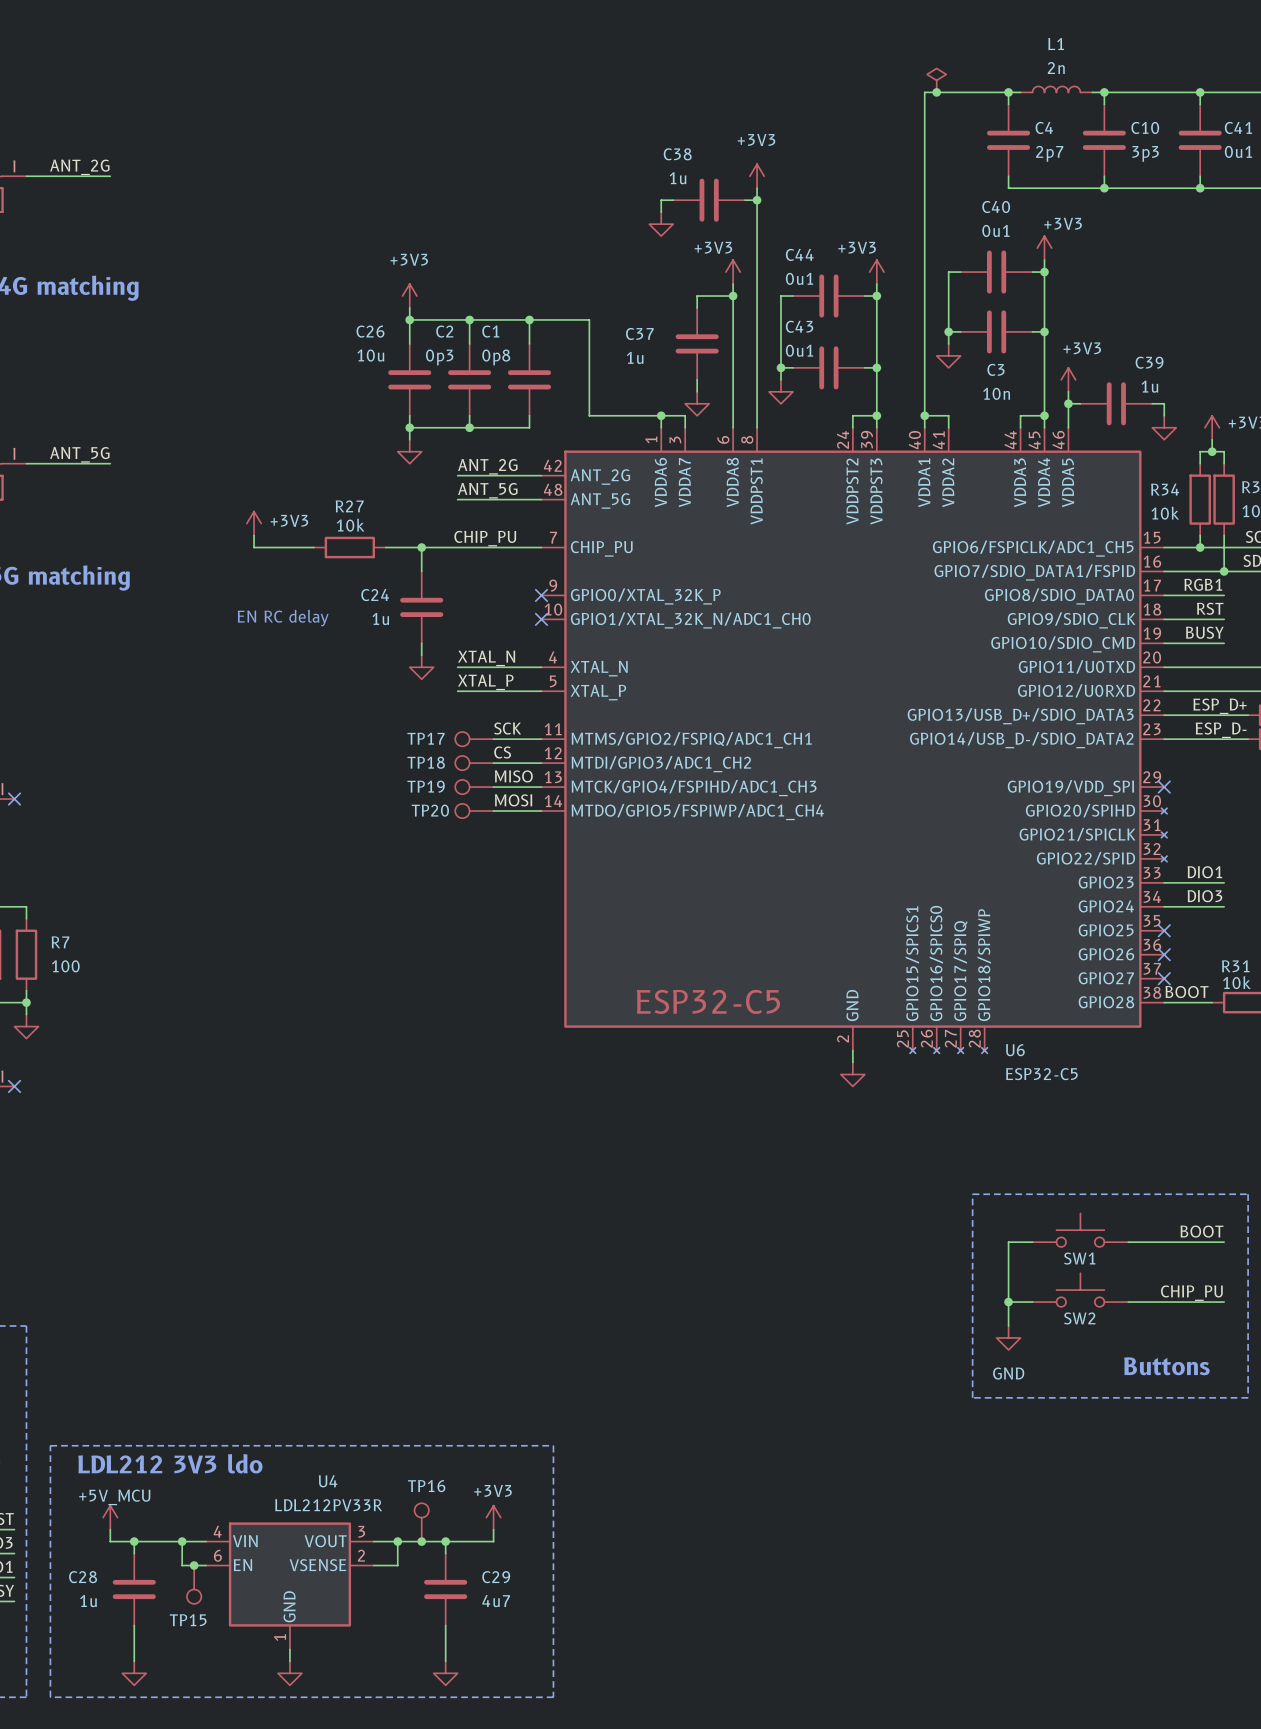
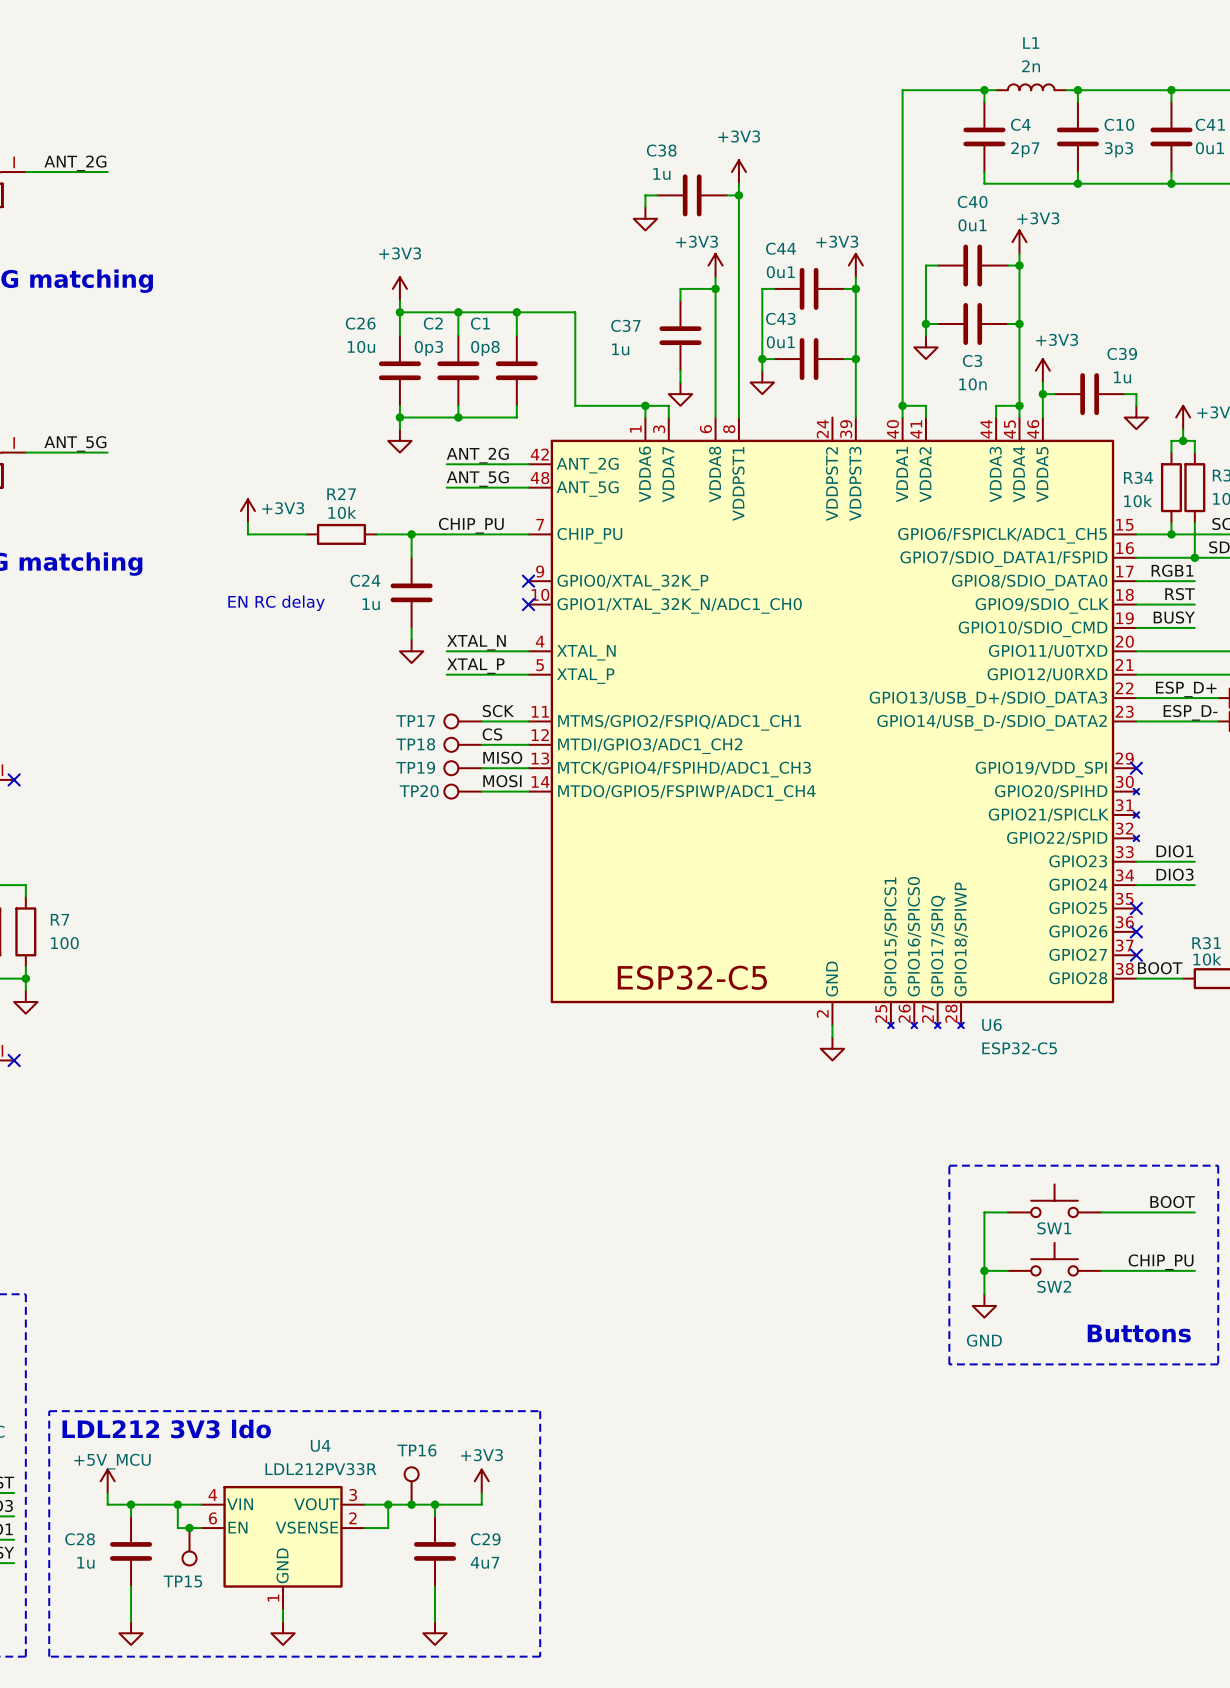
power symbol: (936, 80) -> none
junction: (936, 92) -> none
wire: (876, 415) (852, 415) (852, 427) -> none
junction: (876, 415) -> none

